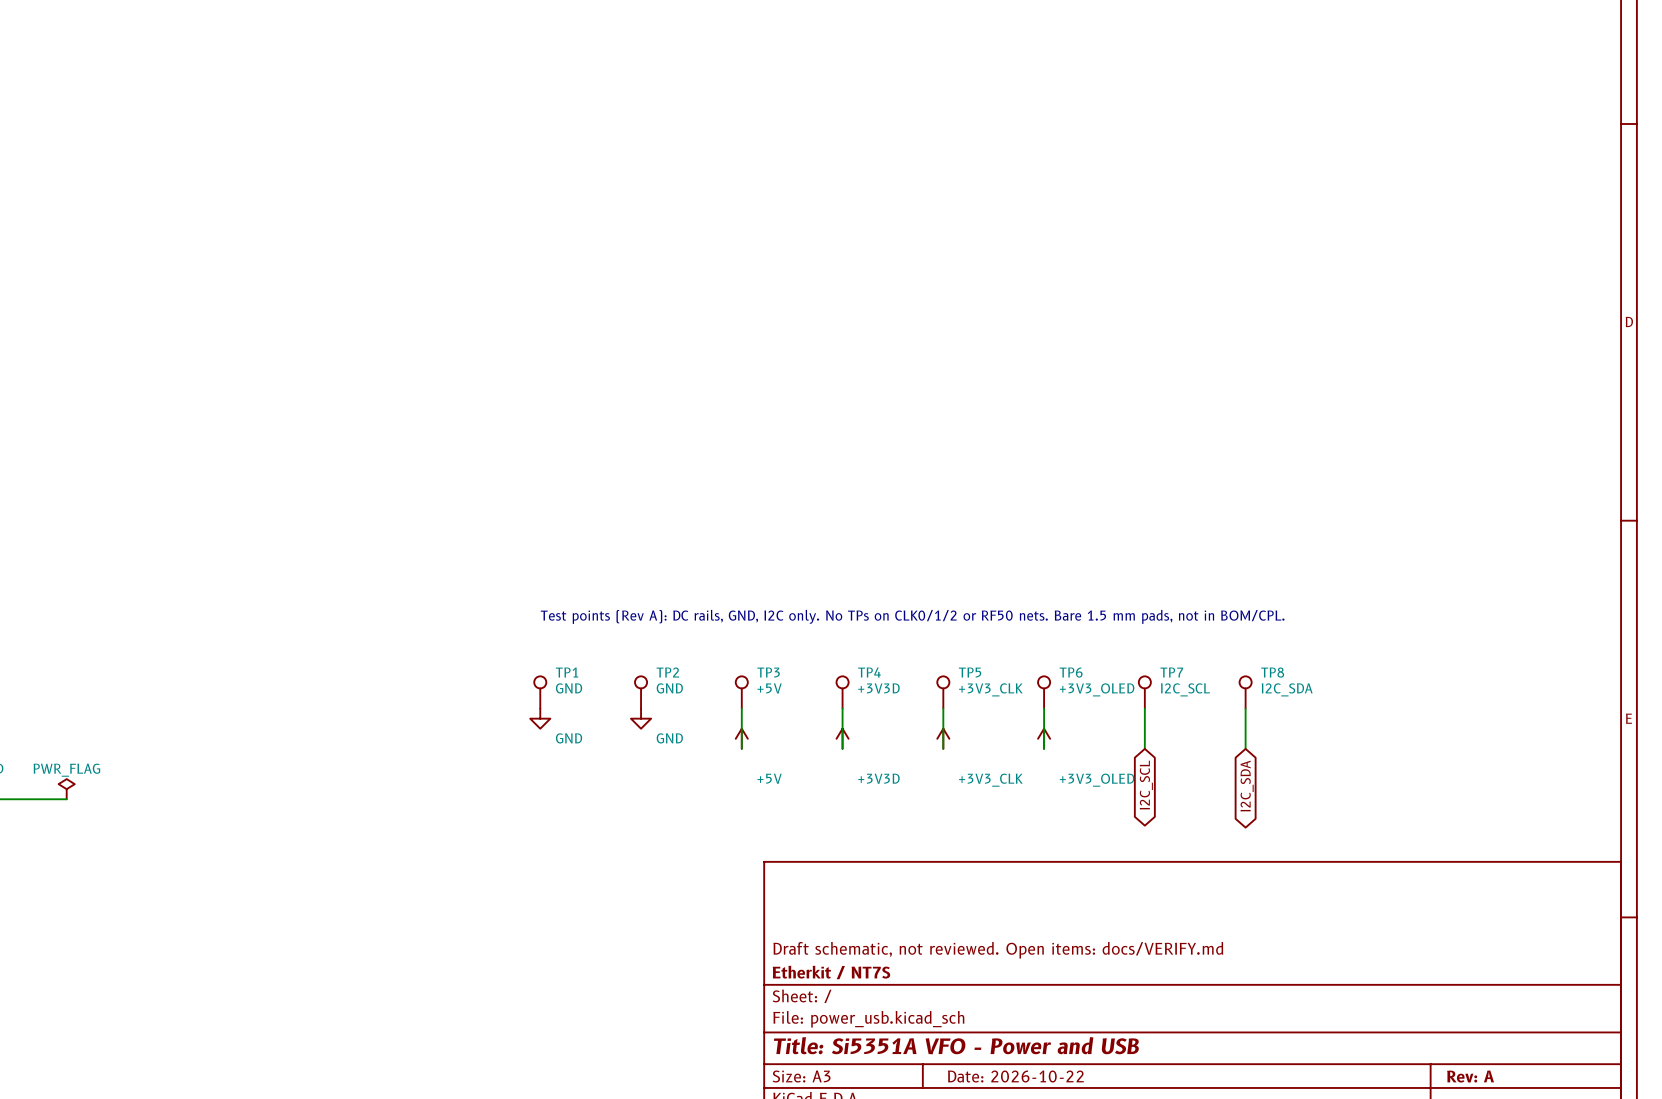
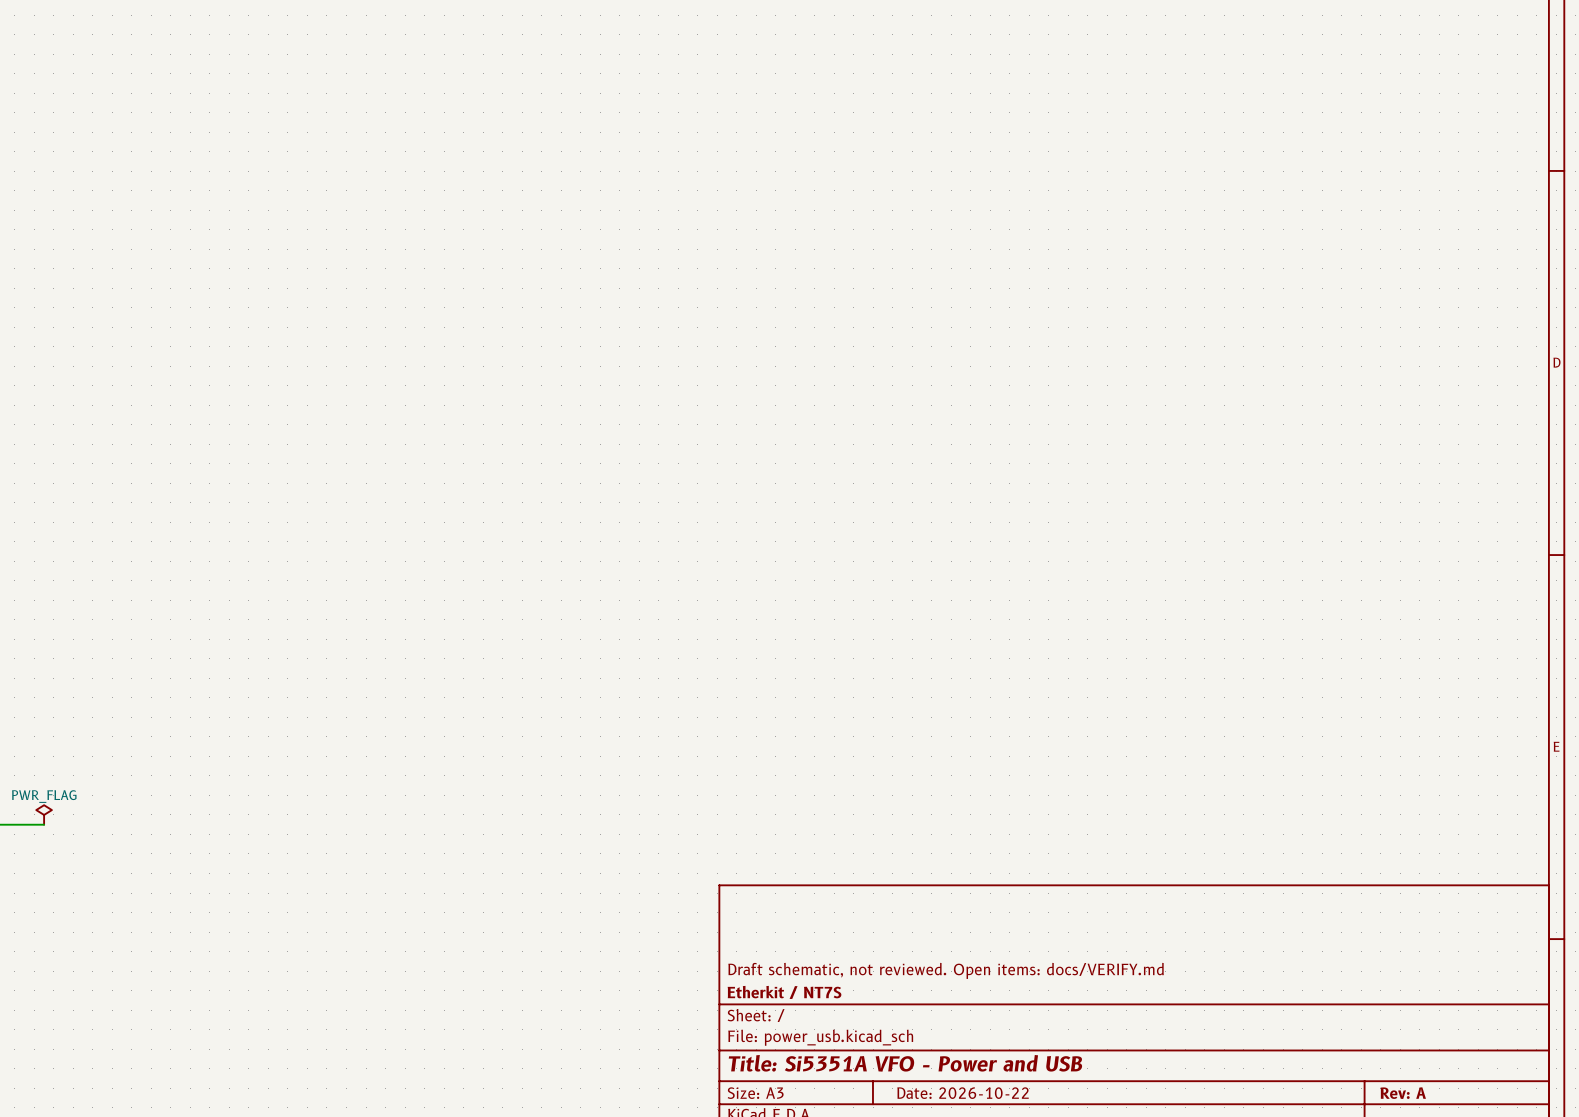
text: Test points (Rev A): DC rails, GND, I2C only. No TPs on CLK0/1/2 or RF50 nets. Bare 1.5 mm pads, not in BOM/CPL. (912, 616) -> none
TP1: GND (540, 692) -> none
TP2: GND (641, 692) -> none
TP3: +5V (741, 692) -> none
TP4: +3V3D (842, 692) -> none
TP5: +3V3_CLK (943, 692) -> none
TP6: +3V3_OLED (1044, 692) -> none
TP7: I2C_SCL (1144, 692) -> none
TP8: I2C_SDA (1245, 692) -> none
wire: (741, 708) (741, 748) -> none
wire: (842, 708) (842, 748) -> none
wire: (943, 708) (943, 748) -> none
wire: (1044, 708) (1044, 748) -> none
wire: (1144, 708) (1144, 748) -> none
wire: (1245, 708) (1245, 748) -> none
power symbol: GND (540, 718) -> none
power symbol: GND (641, 718) -> none
power symbol: +5V (741, 738) -> none
power symbol: +3V3D (842, 738) -> none
power symbol: +3V3_CLK (943, 738) -> none
power symbol: +3V3_OLED (1044, 738) -> none
global label: I2C_SCL (1146, 785) -> none
global label: I2C_SDA (1247, 786) -> none

